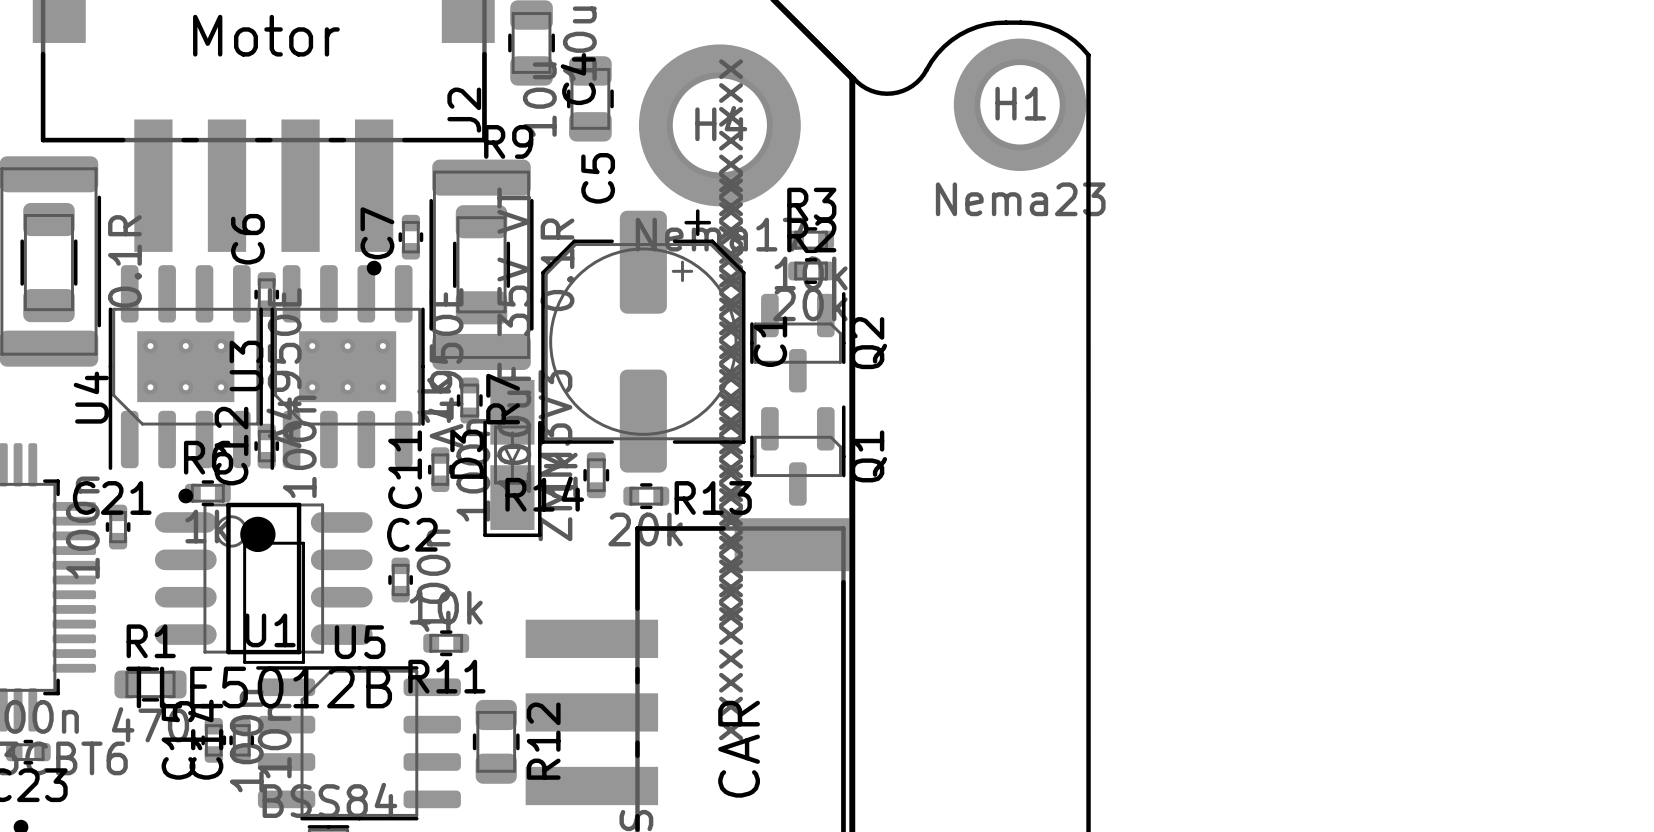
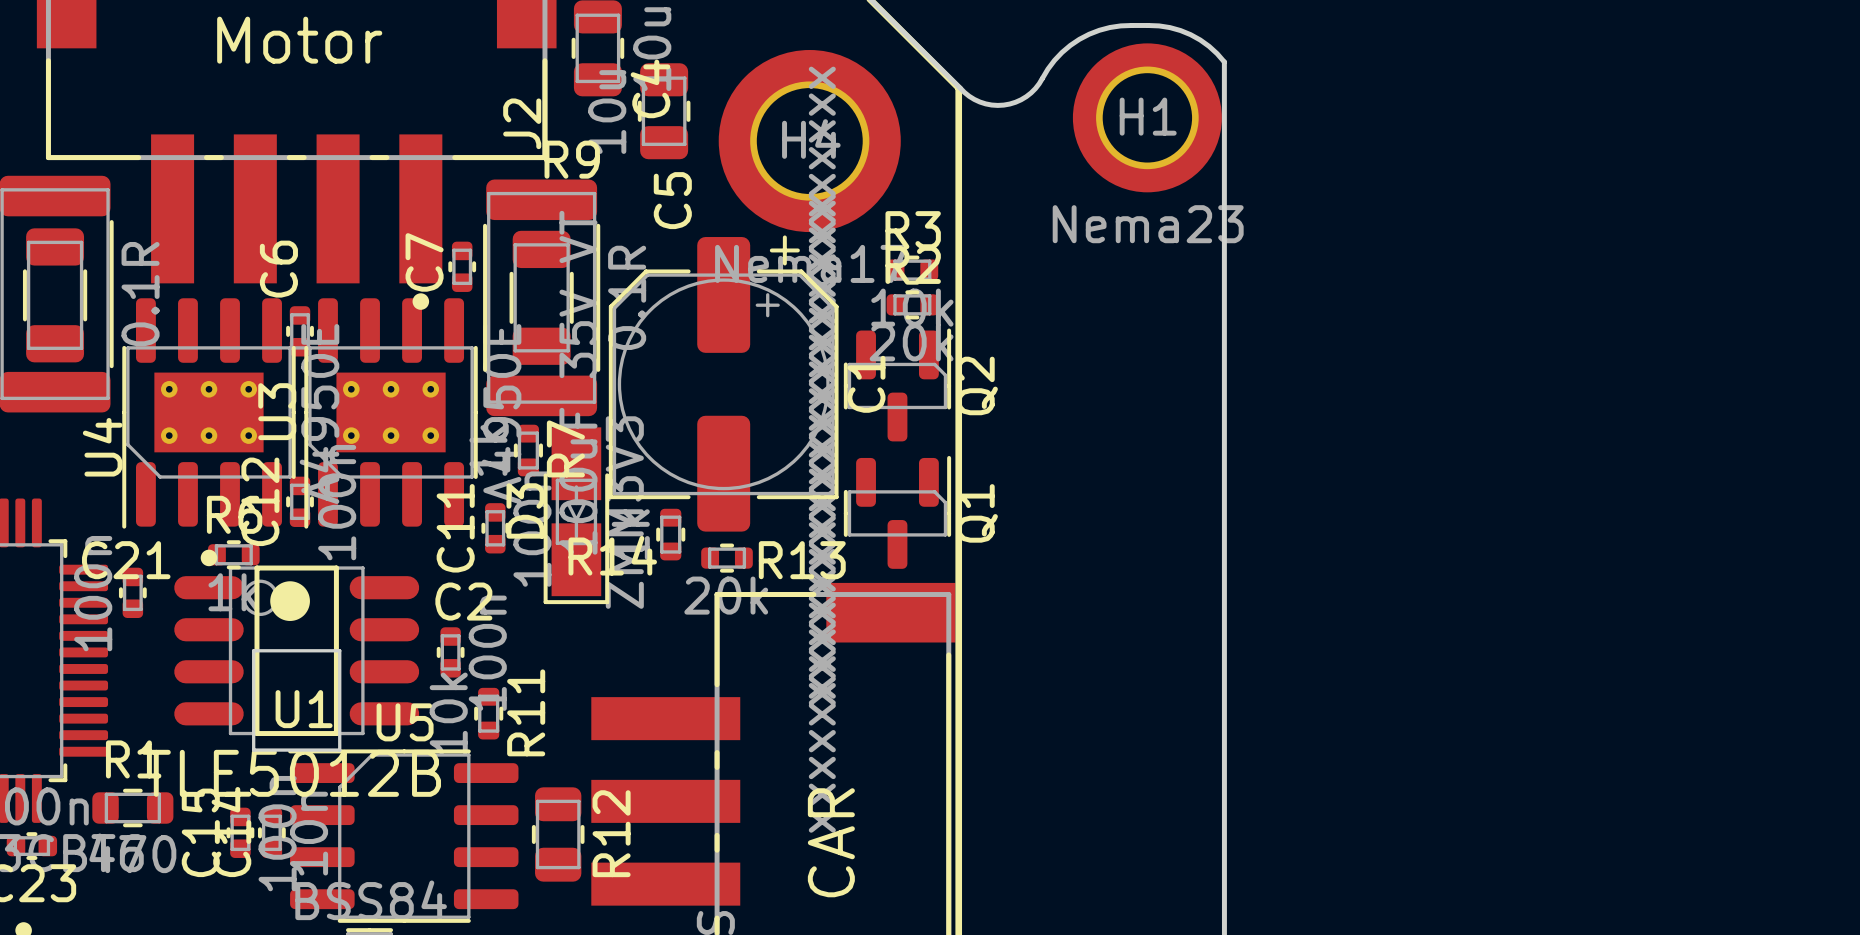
board edge: (244, 543) (303, 543) (303, 662) (244, 662) (244, 543) -> (253, 650) (253, 750) (339, 750) (339, 650) (253, 650)
R11 rotation: 0° (446, 643) -> 90° clockwise (488, 713)
R1 position: (150, 684) -> (132, 808)

